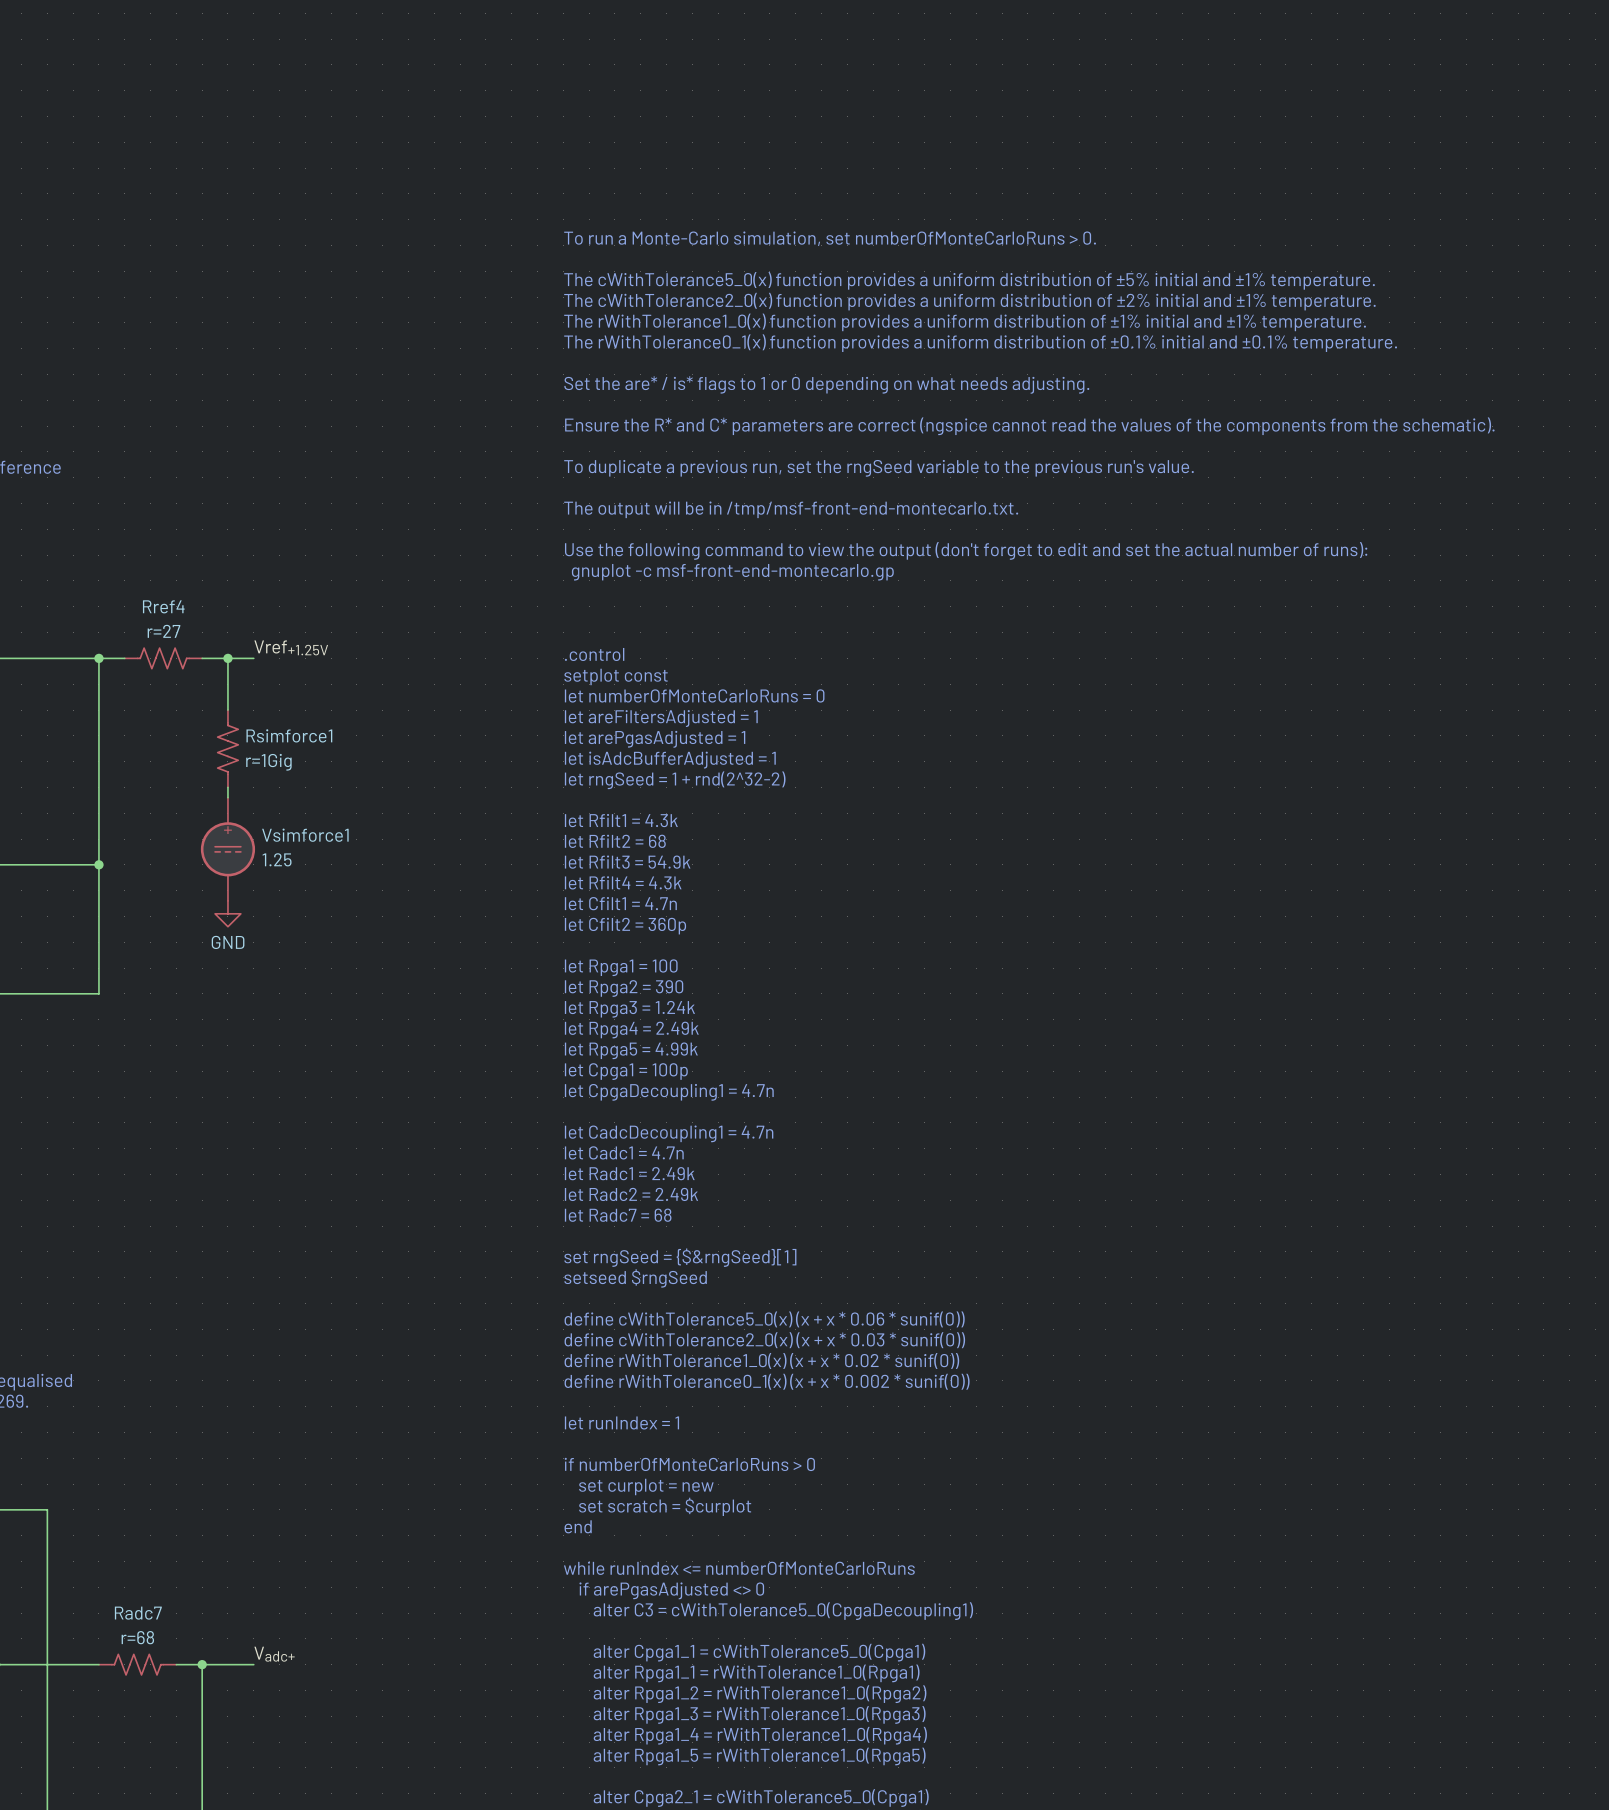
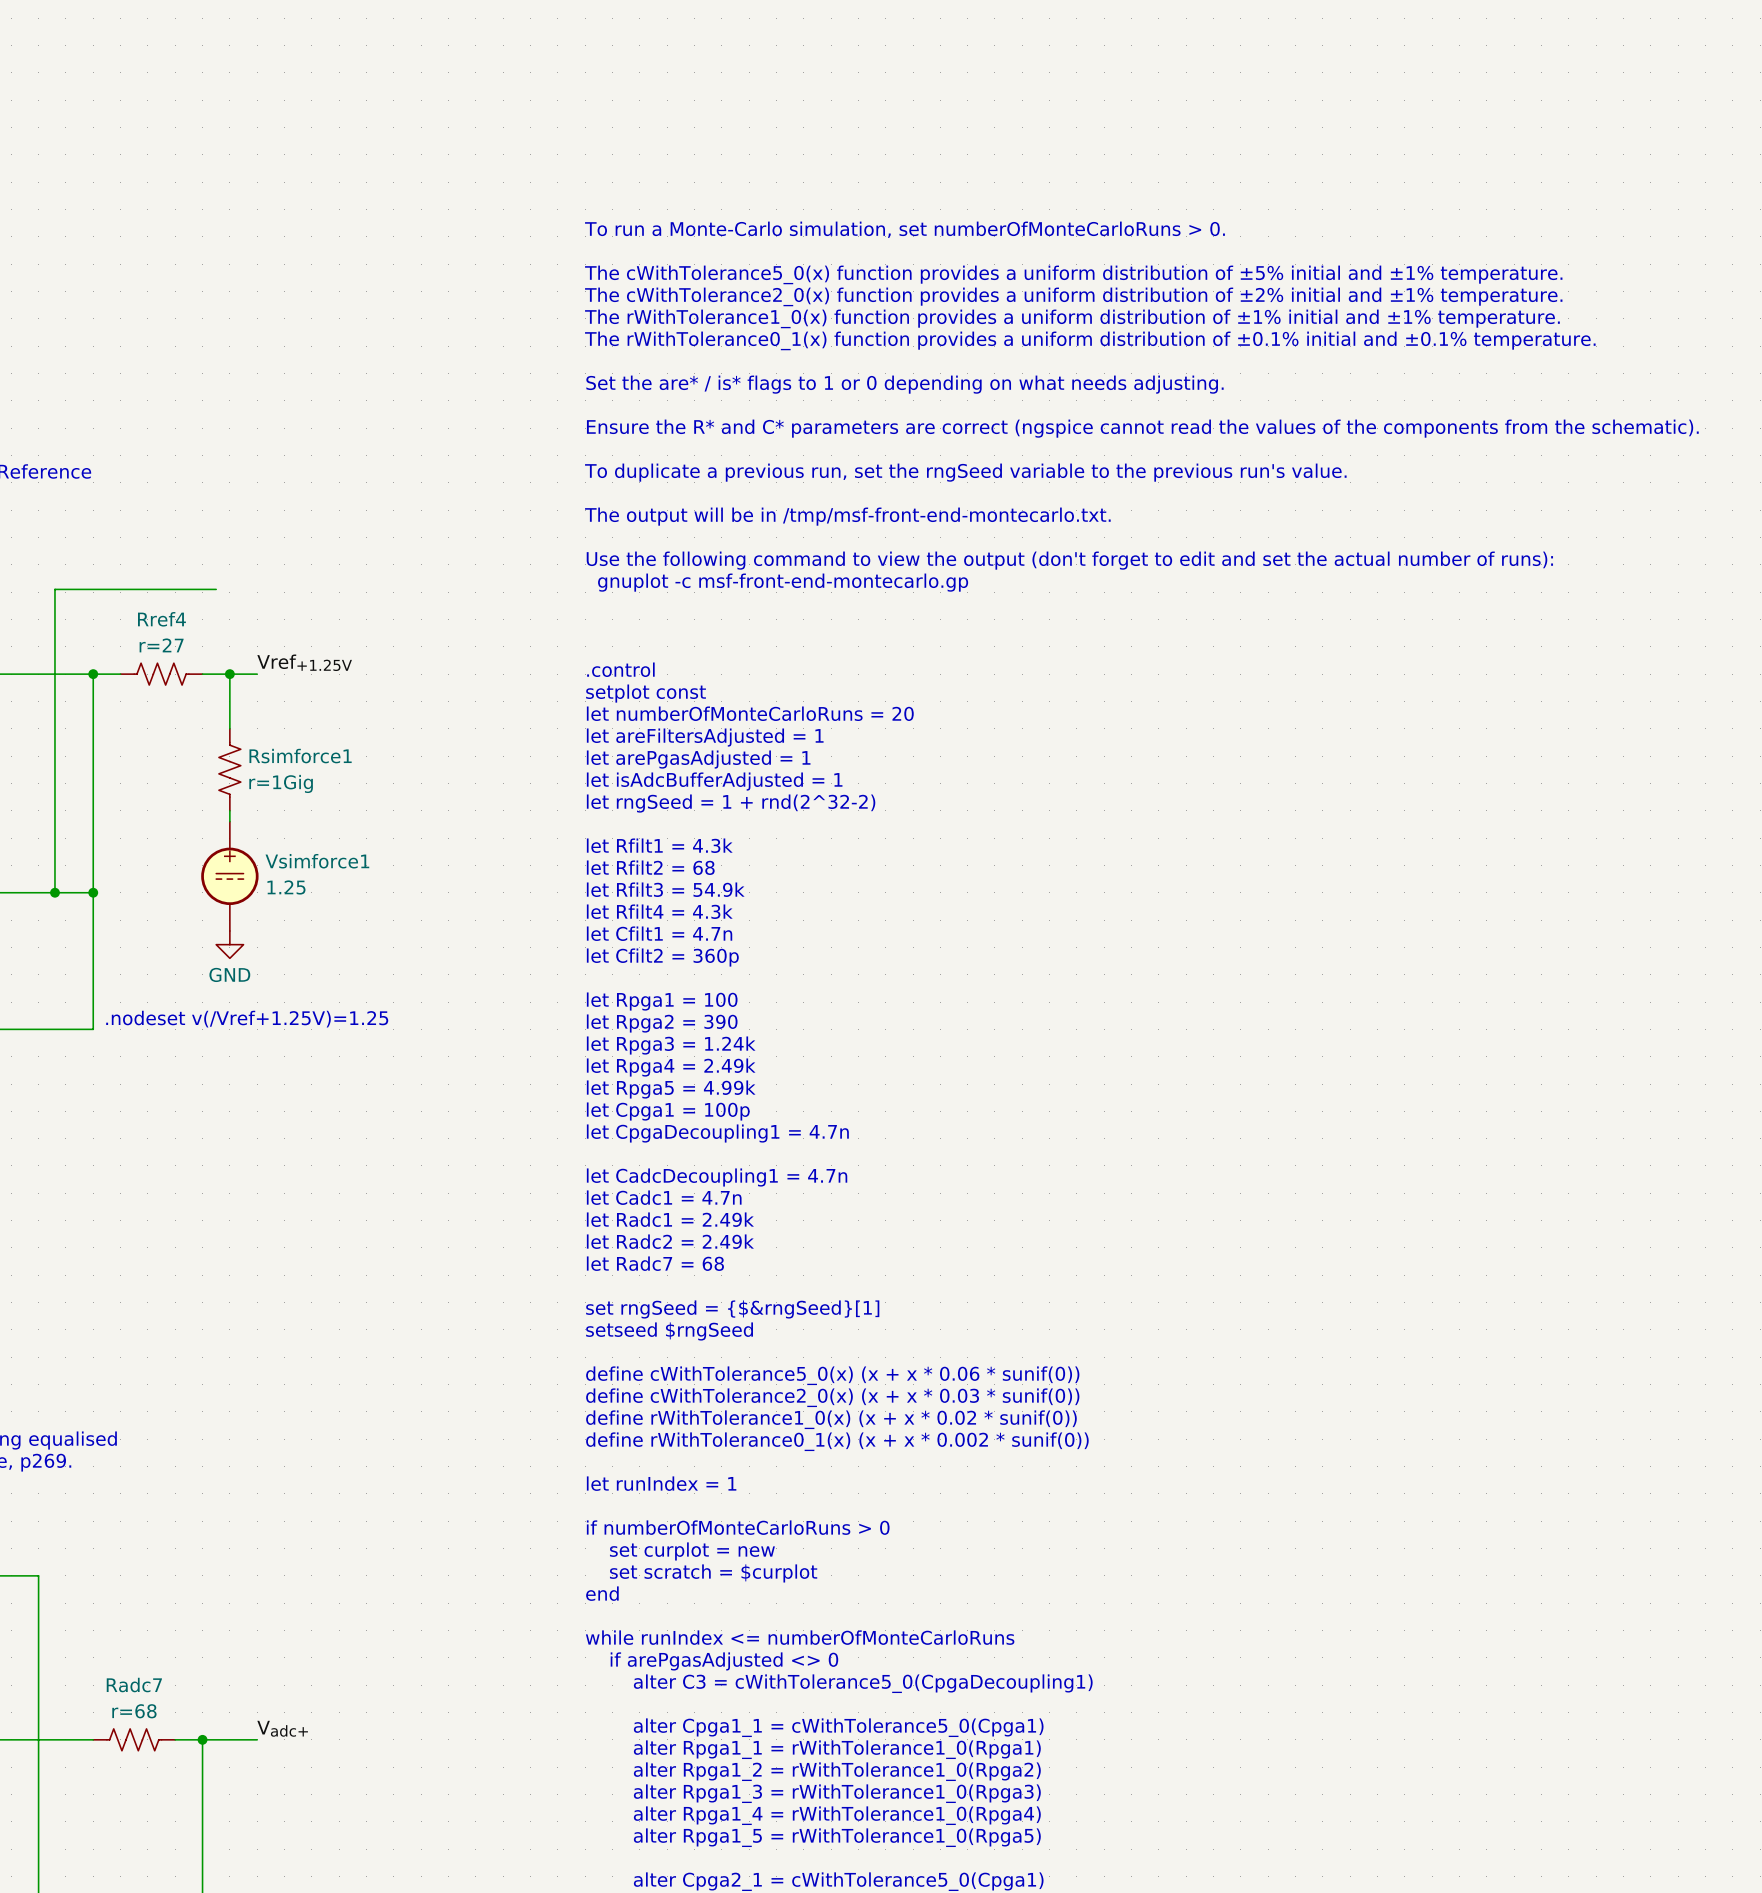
wire: none -> (216, 589) (54, 589) (54, 892)
text: let numberOfMonteCarloRuns = 0 (694, 695) -> let numberOfMonteCarloRuns = 20 (750, 713)
junction: none -> (54, 892)
text: none -> .nodeset v(/Vref+1.25V)=1.25 (247, 1019)

